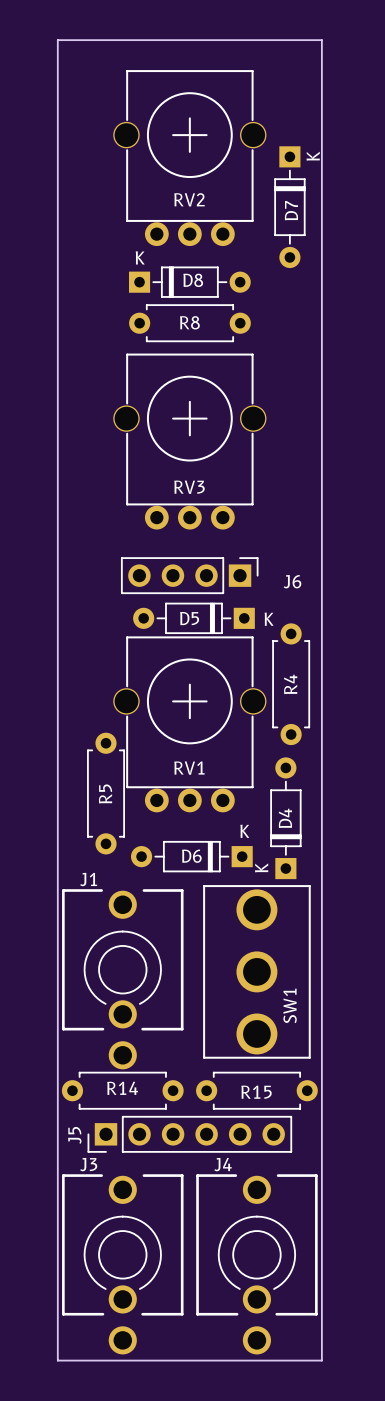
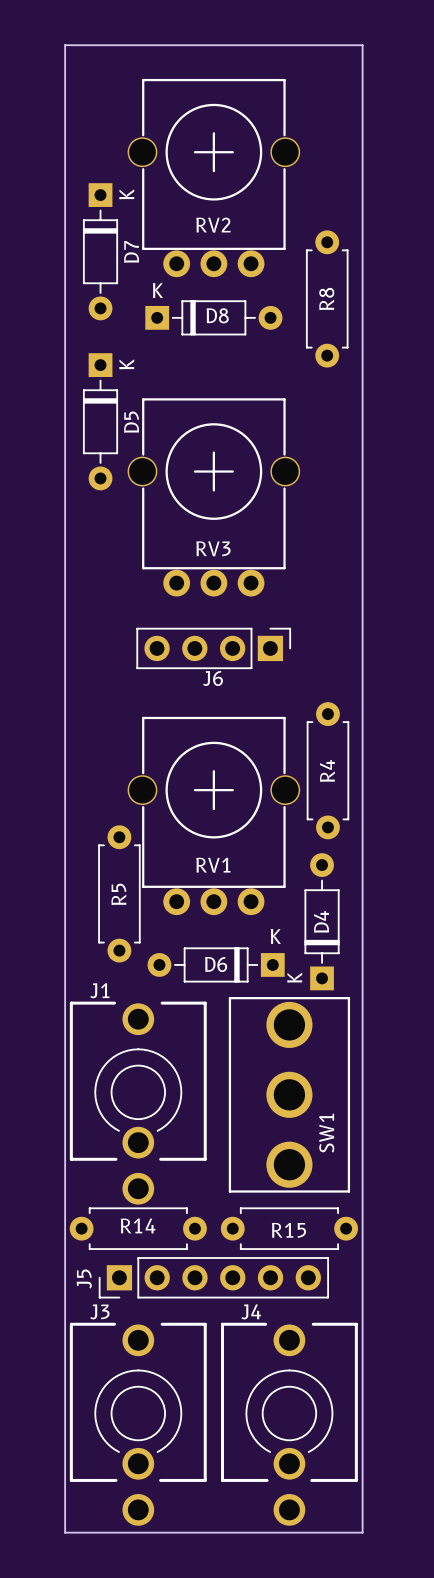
D7 position: (289, 207) -> (100, 251)
D7 name position: D7 (291, 210) -> D7 (131, 251)
R8 rotation: 0° (189, 323) -> 90° clockwise (327, 298)
R8 position: (189, 323) -> (327, 298)
J6 name position: J6 (292, 581) -> J6 (213, 678)
D5 footprint: [133, 602, 255, 634] -> [82, 353, 119, 491]
D5 name position: D5 (189, 618) -> D5 (131, 422)

